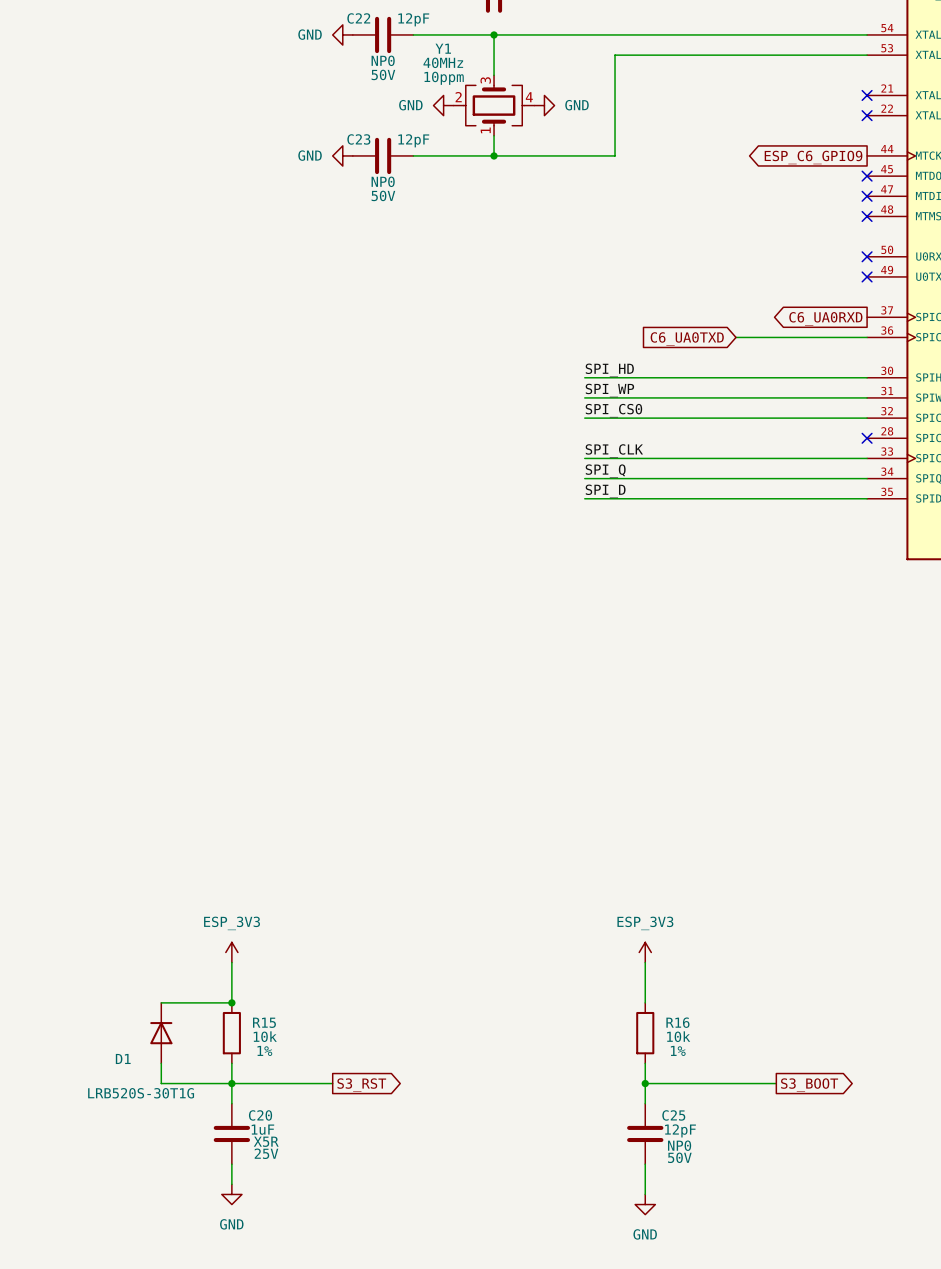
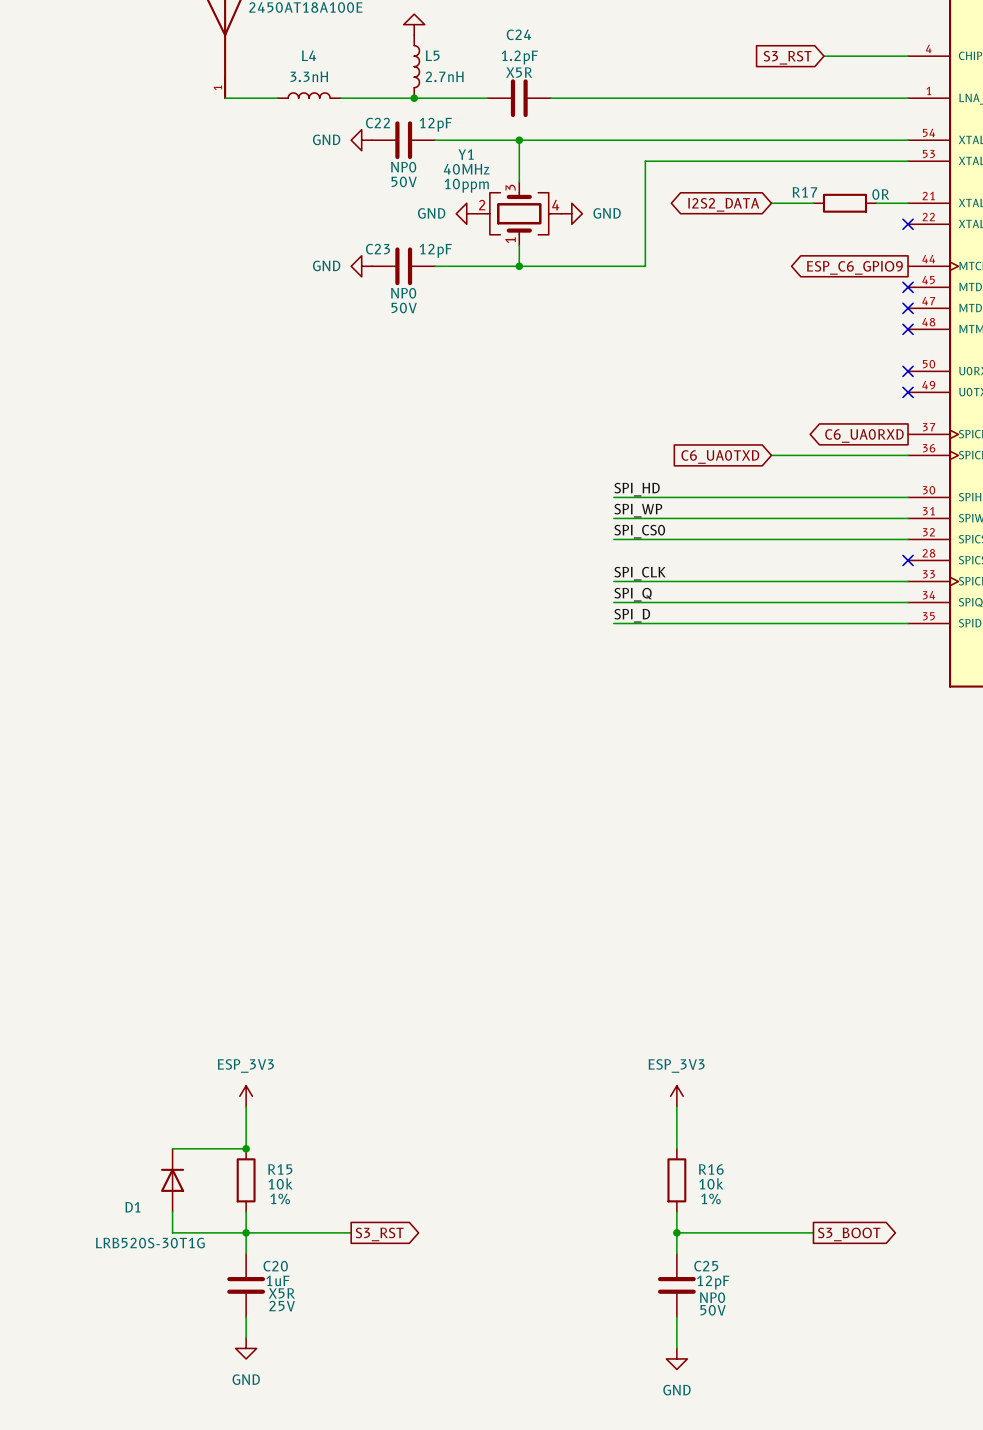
wire: none -> (771, 203) (813, 203)
R17: none -> 0R (844, 203)
wire: none -> (876, 203) (908, 203)
no-connect mark: (867, 95) -> none
global label: none -> I2S2_DATA (723, 204)

